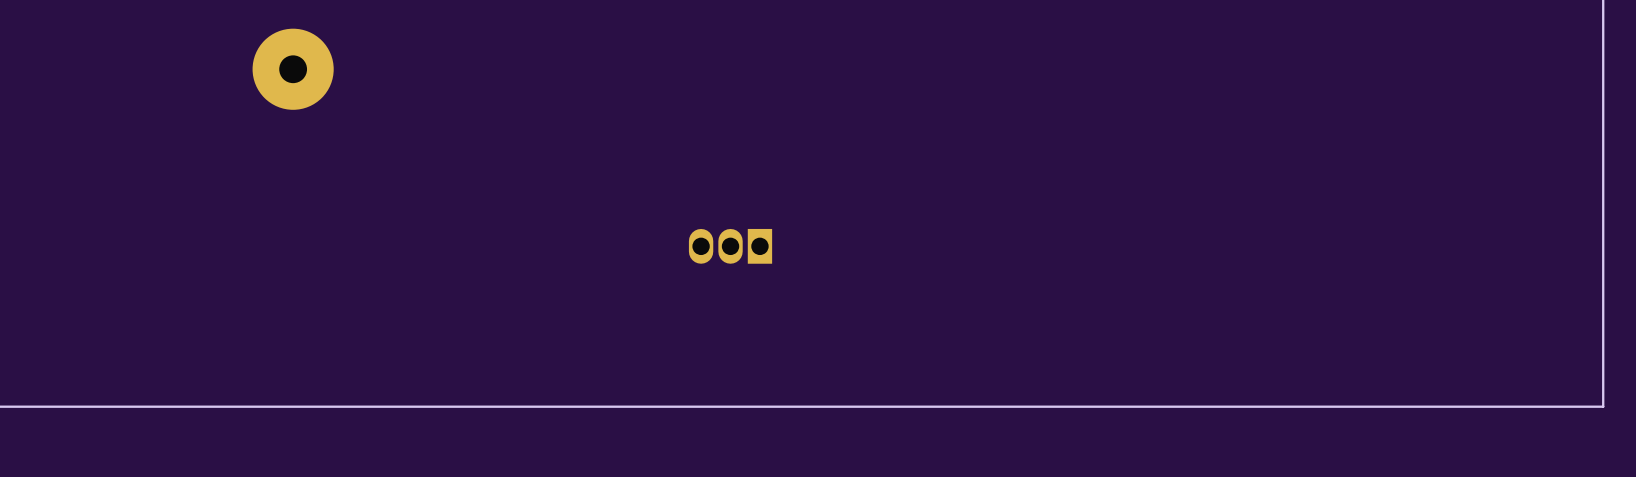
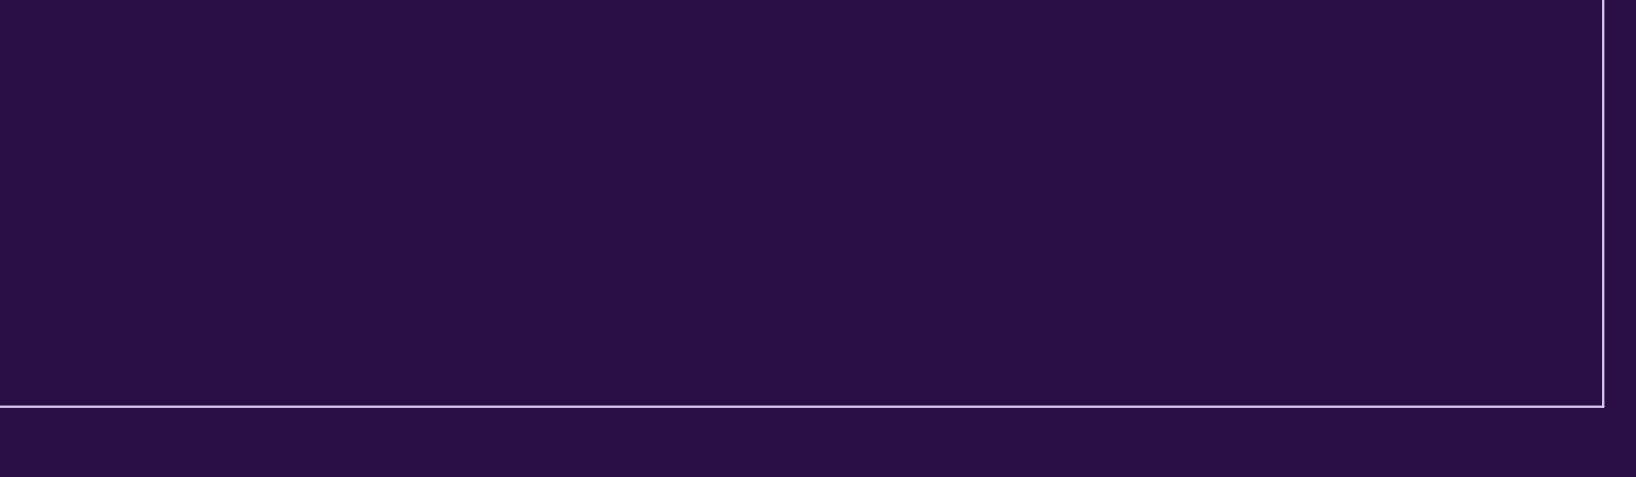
part: (293, 69) -> none
part: (730, 246) -> none

